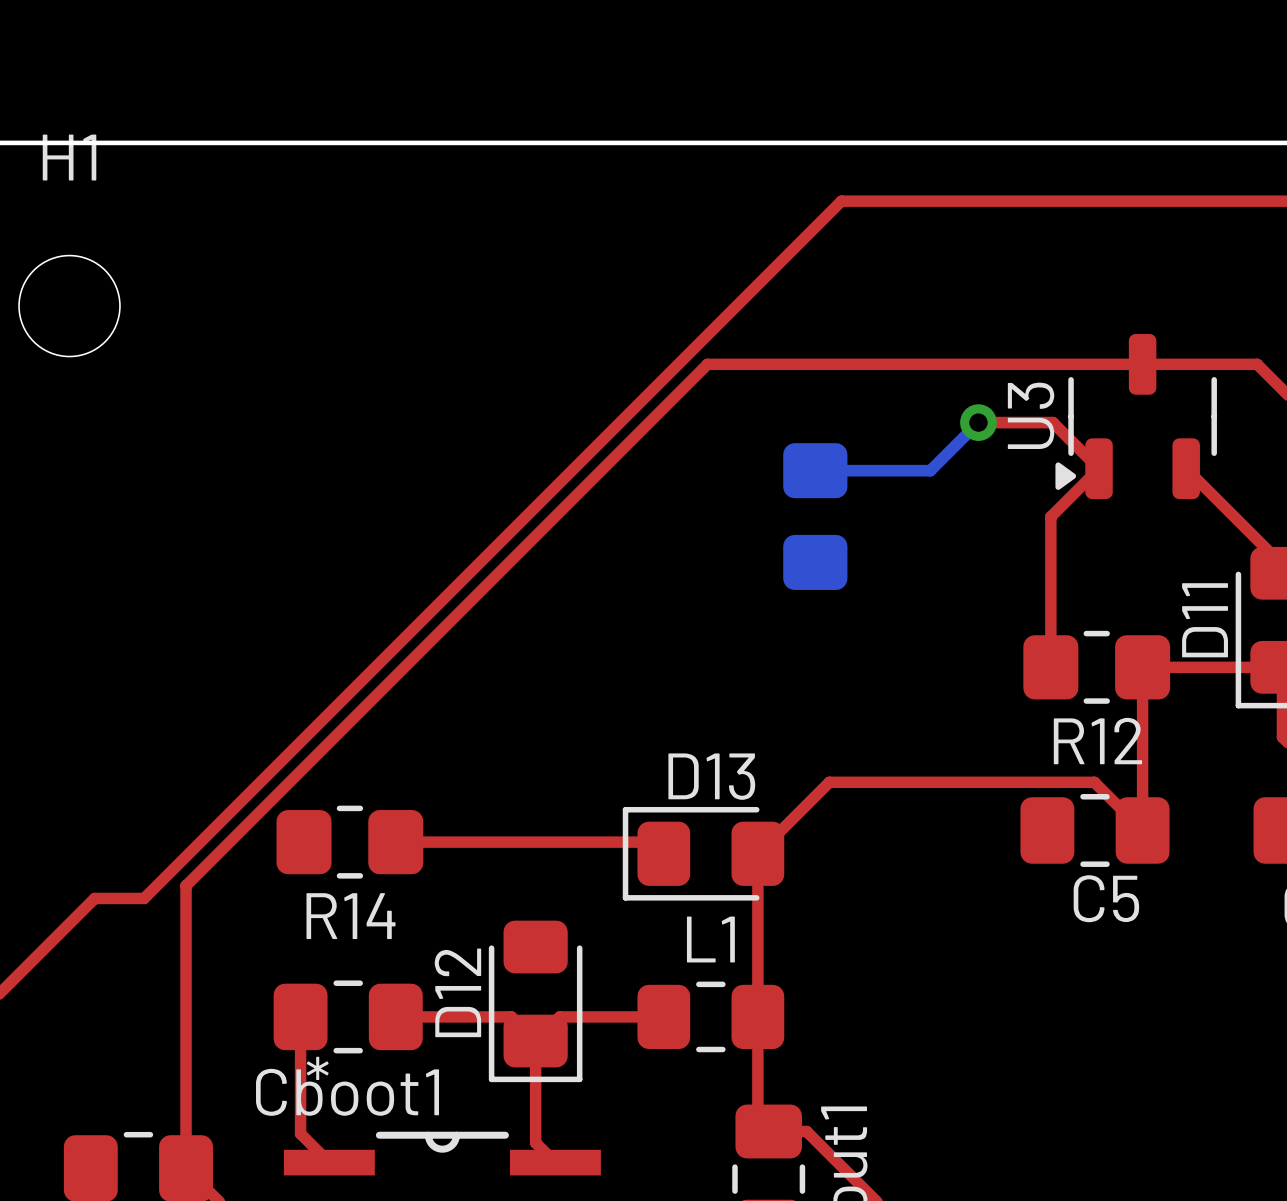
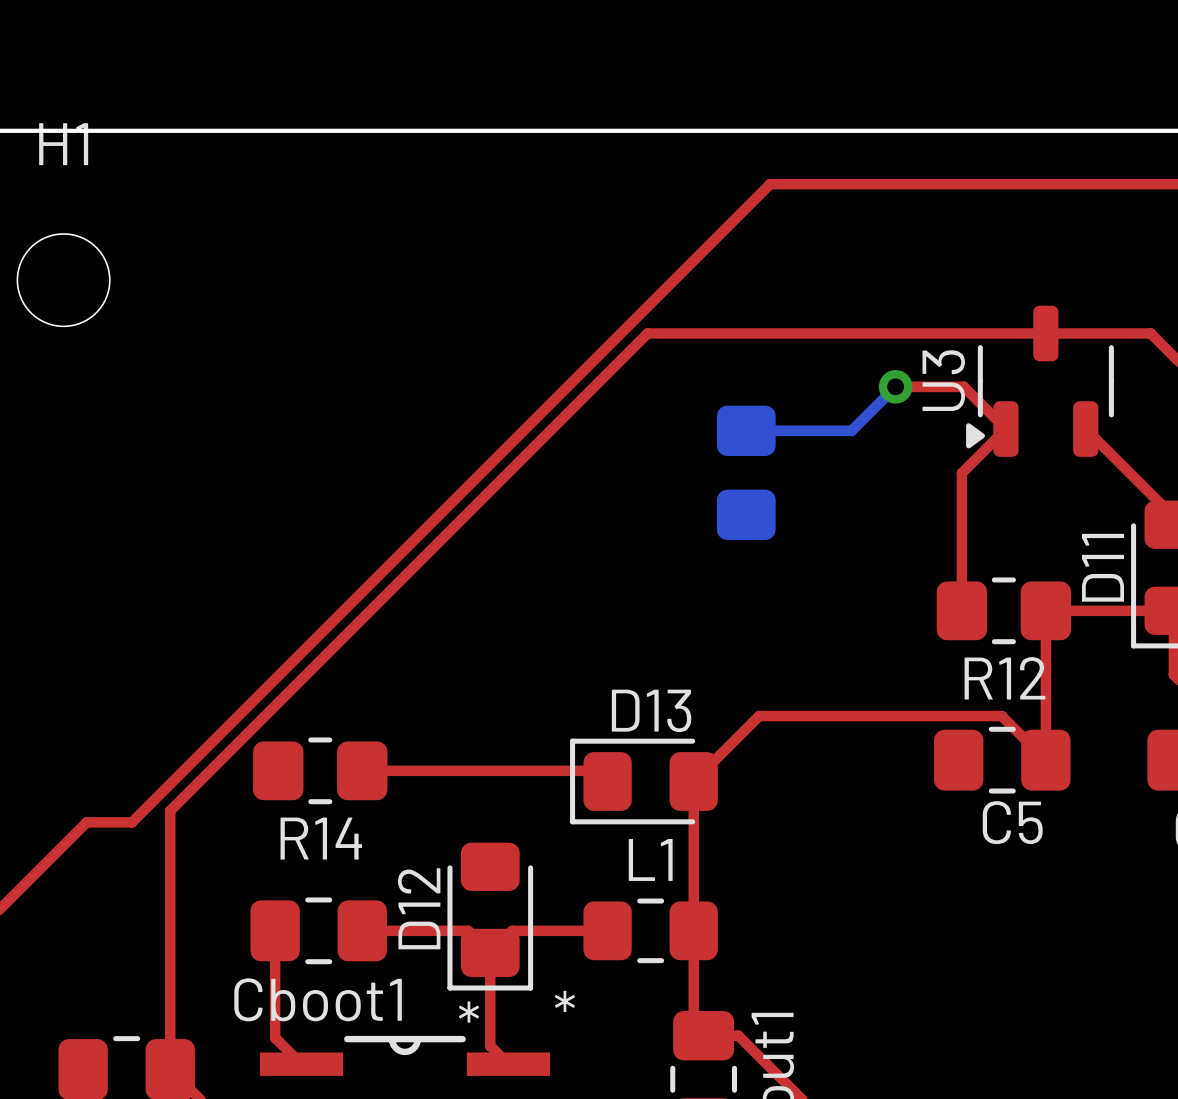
part text position: * (317, 1068) -> * (468, 1012)
part text: none -> * (564, 1001)

